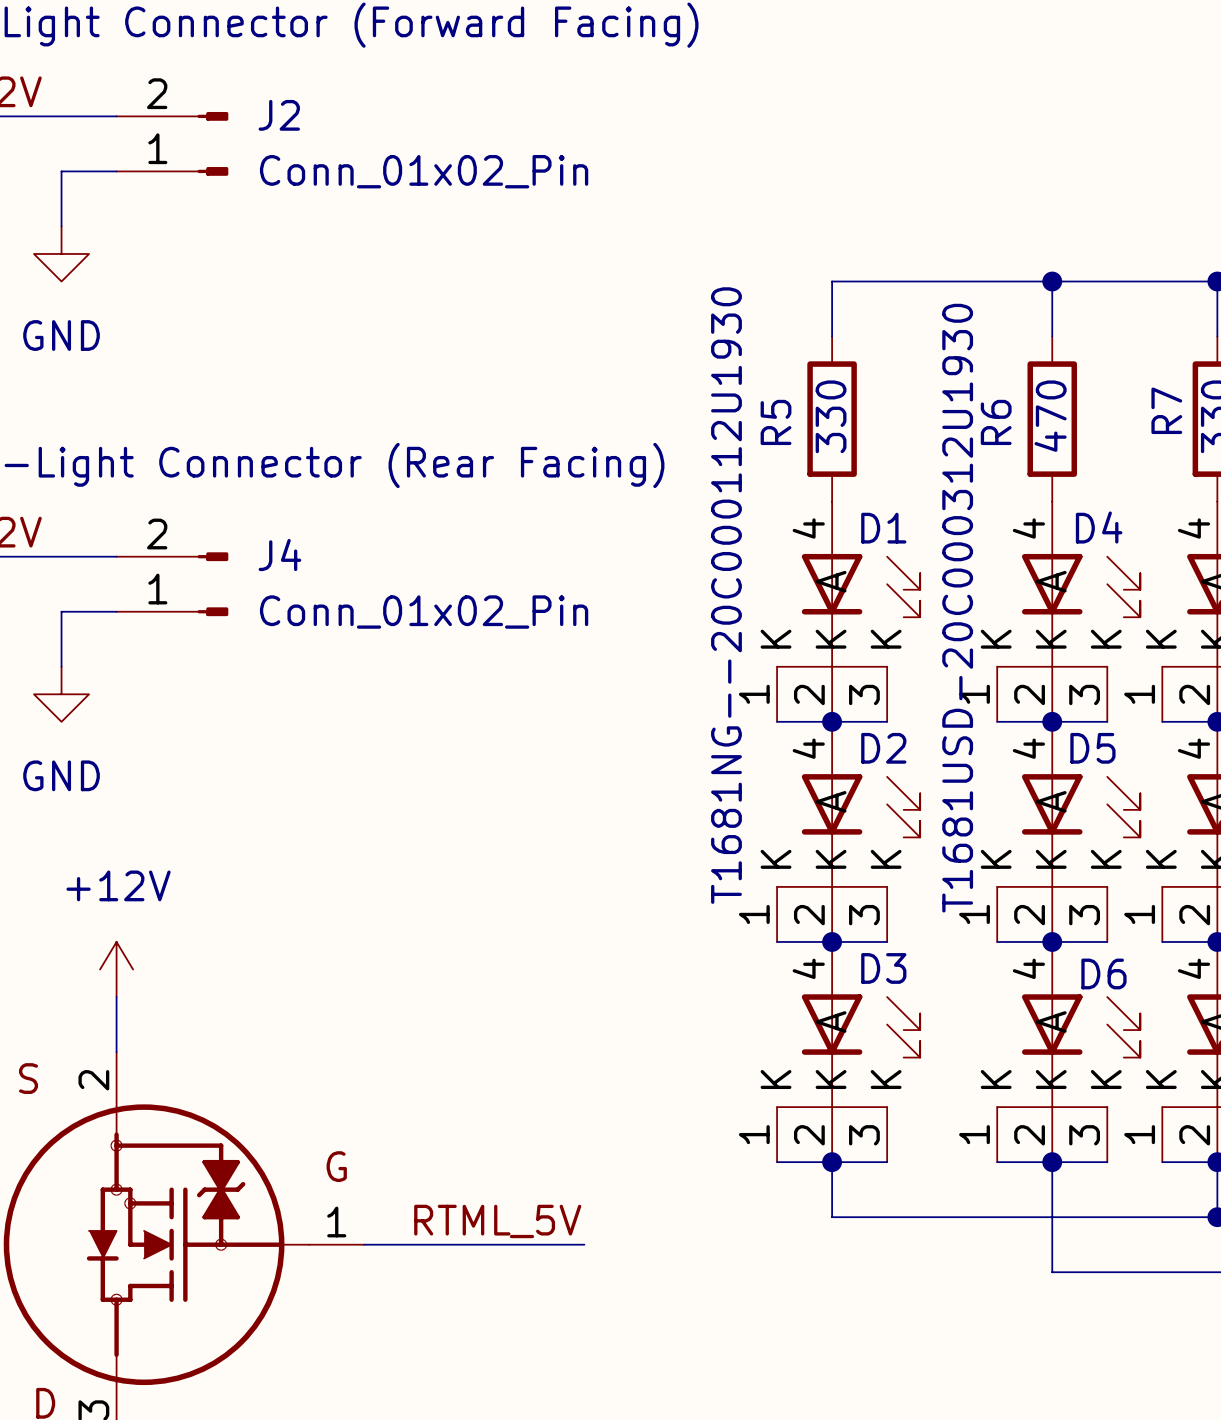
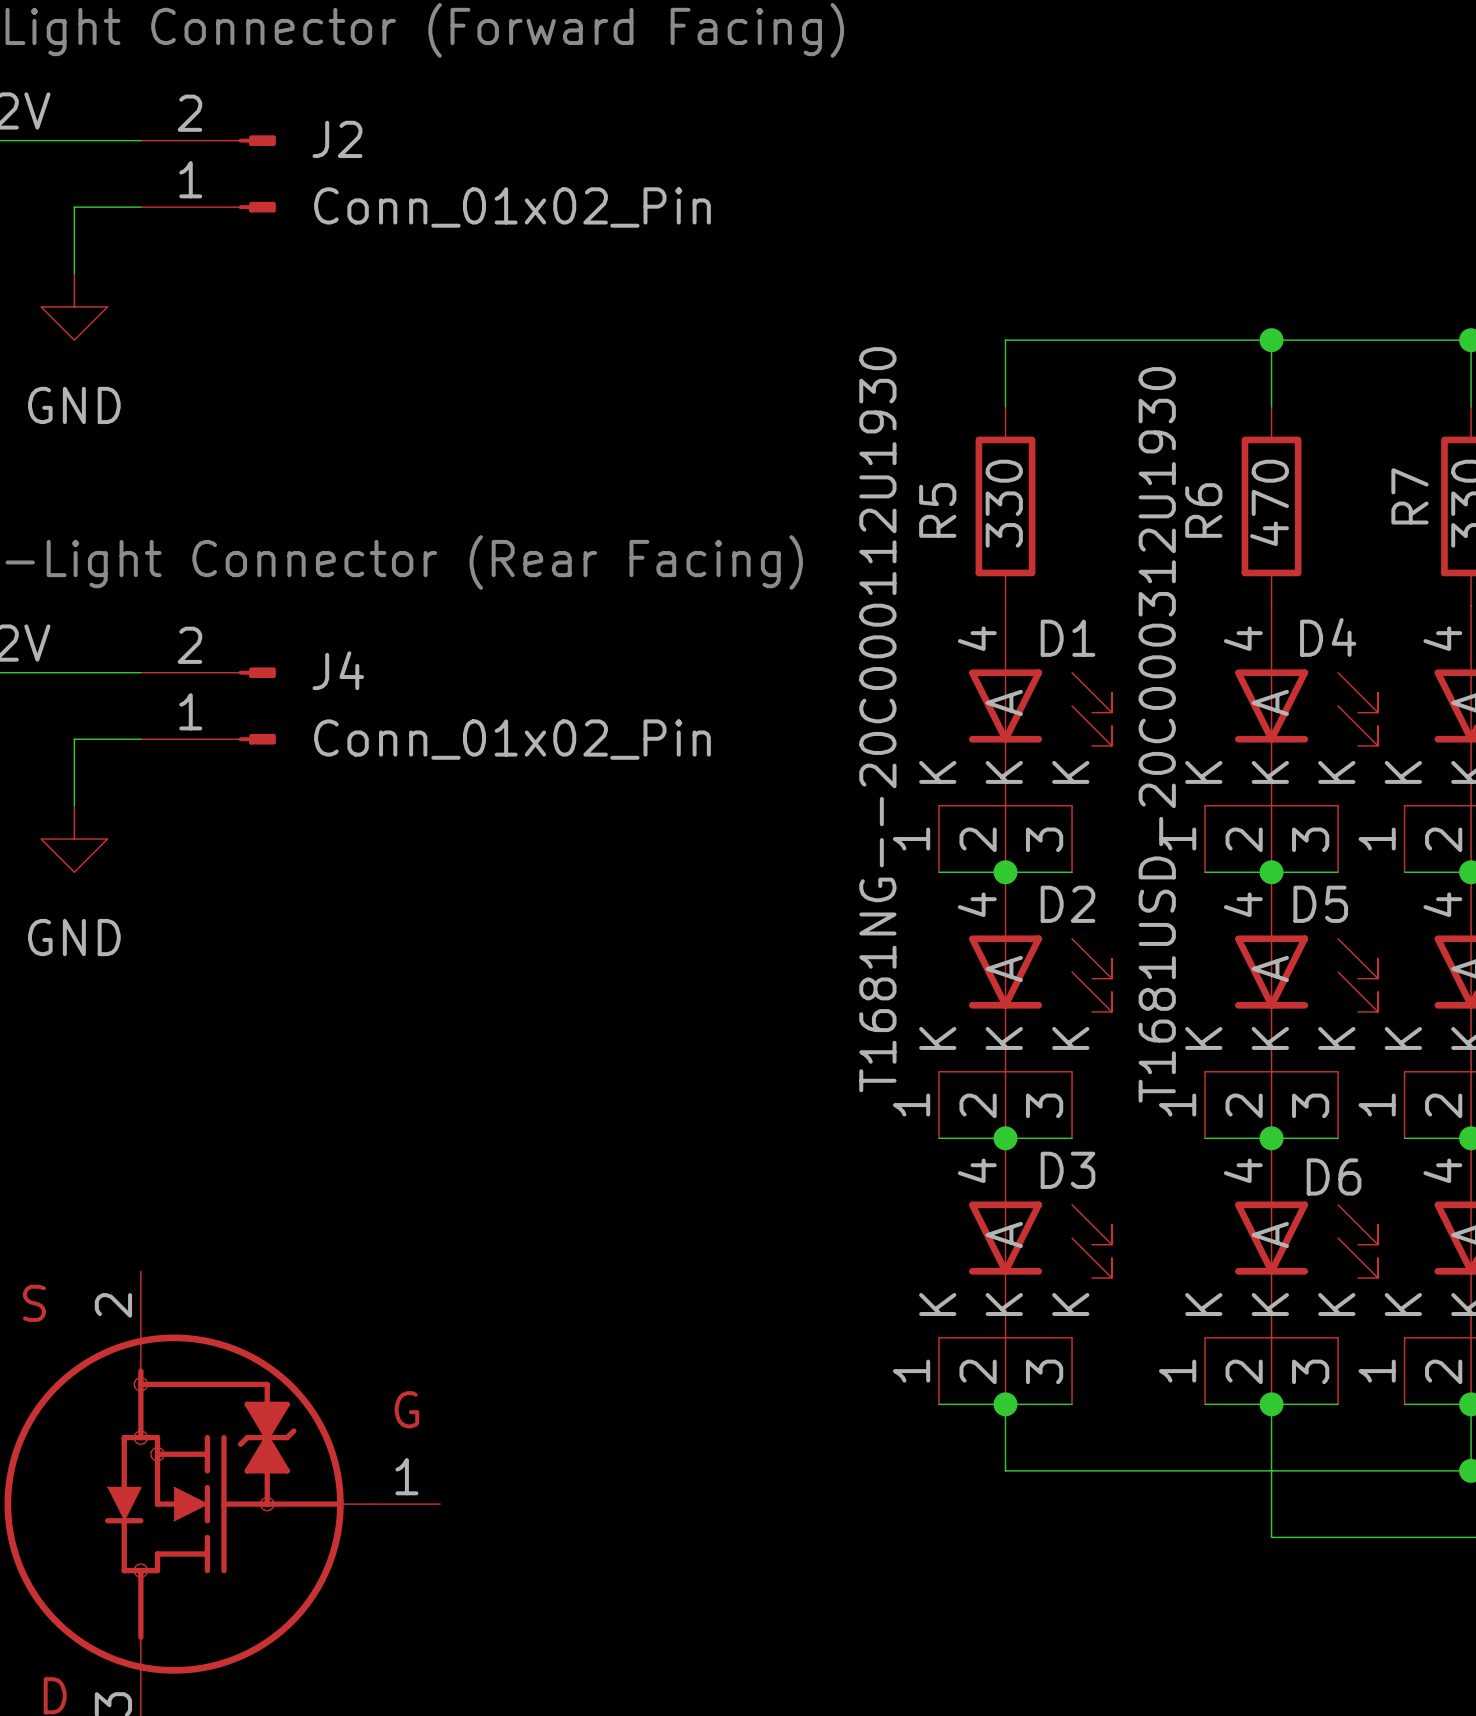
power symbol: +12V (116, 969) -> none
wire: (116, 997) (116, 1052) -> none
label: RTML_5V (497, 1221) -> none
wire: (364, 1244) (584, 1244) -> none

